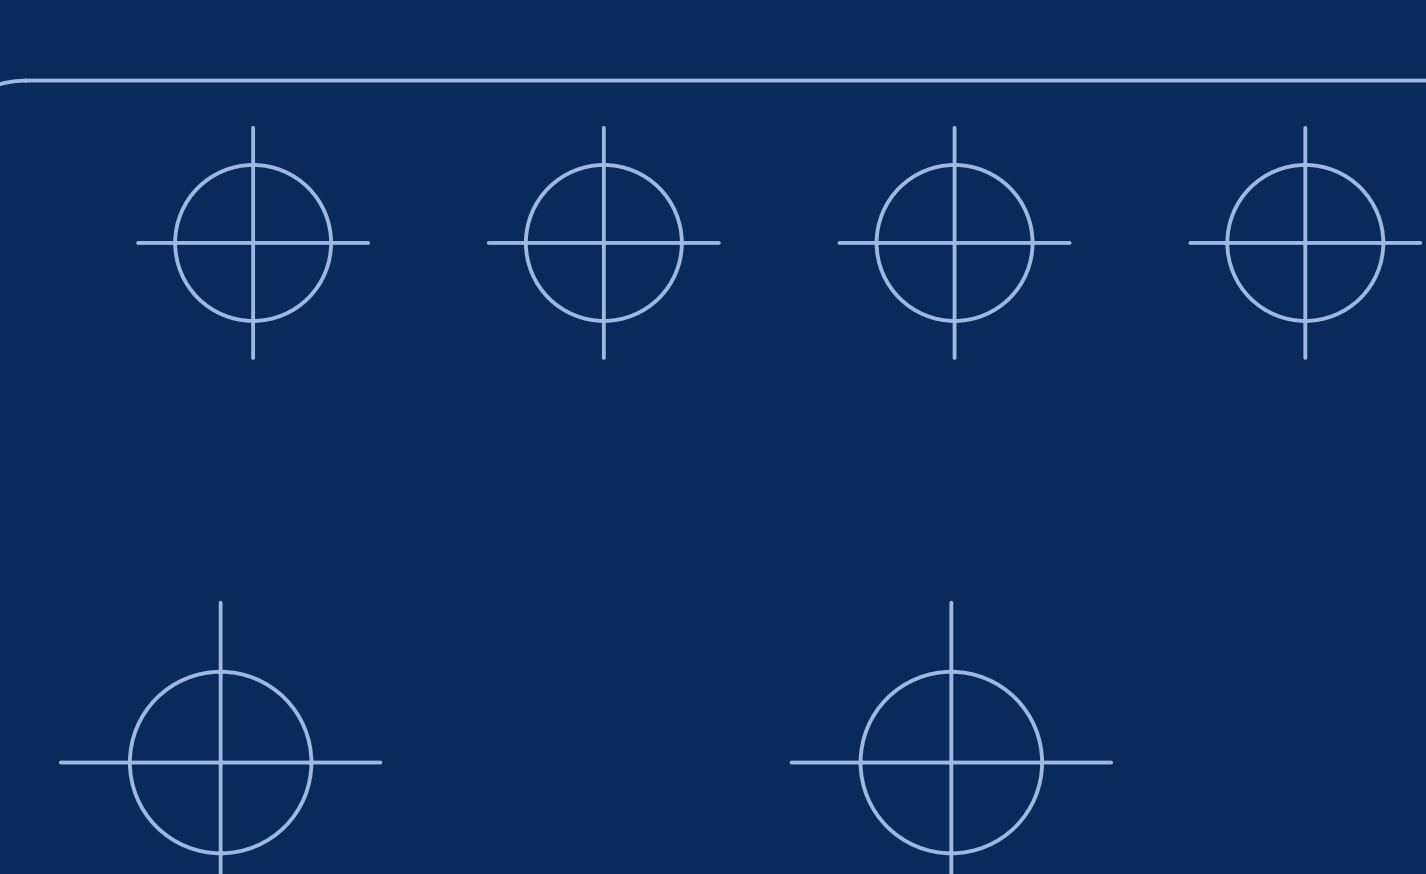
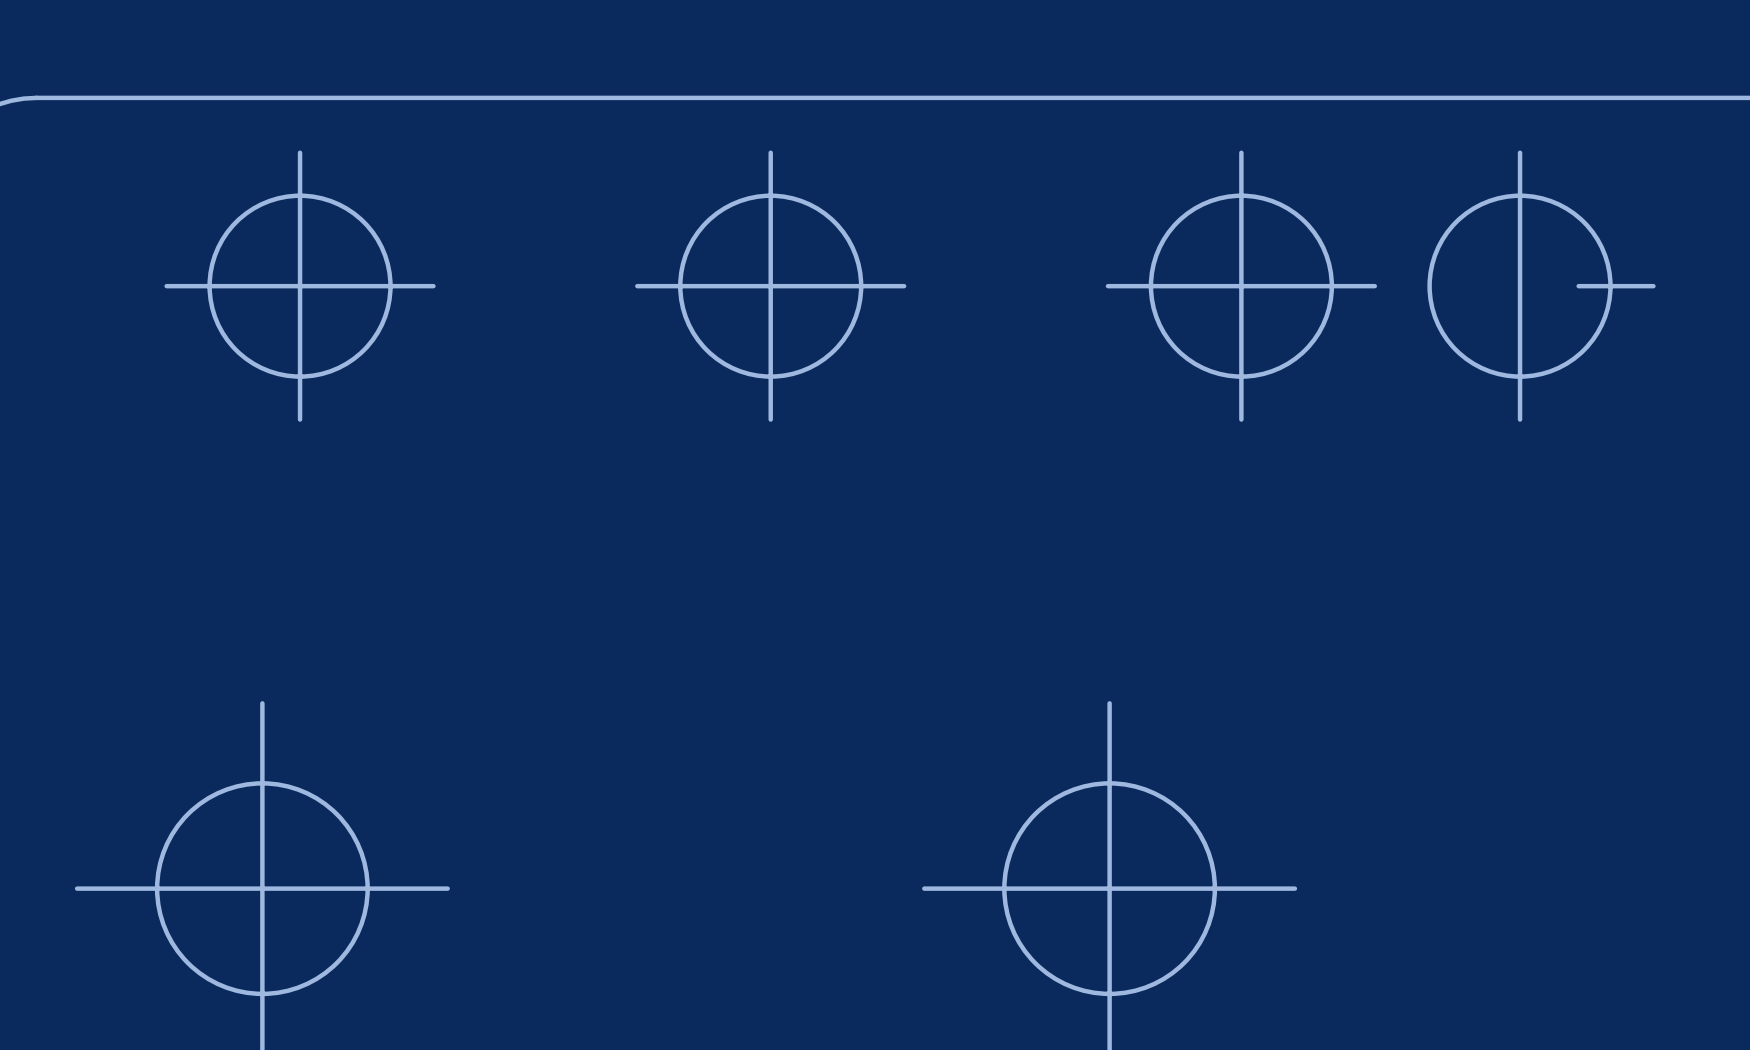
line: (603, 127) (603, 358) -> (770, 152) (770, 419)
line: (954, 127) (954, 358) -> (1241, 152) (1241, 419)
line: (488, 242) (543, 242) -> (840, 286) (904, 286)
drawing position: (603, 242) -> (770, 286)
line: (839, 242) (949, 242) -> (1246, 286) (1374, 286)
drawing position: (954, 242) -> (1241, 286)
line: (1190, 242) (1355, 242) -> none

